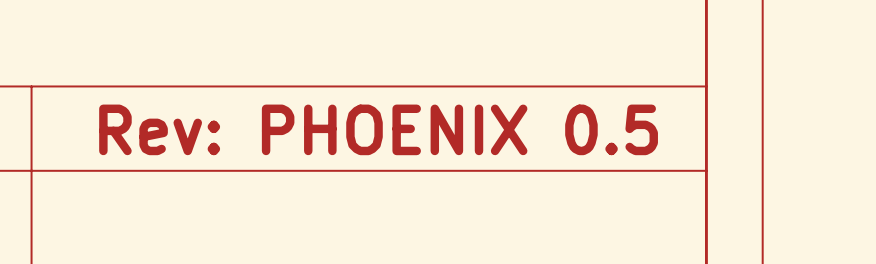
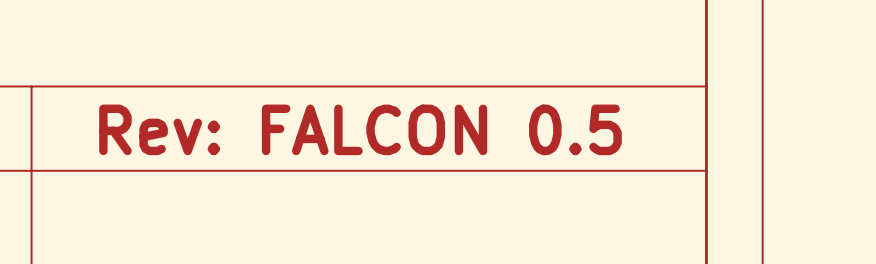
title block: Rev: PHOENIX 0.5 (378, 129) -> Rev: FALCON 0.5 (360, 129)

